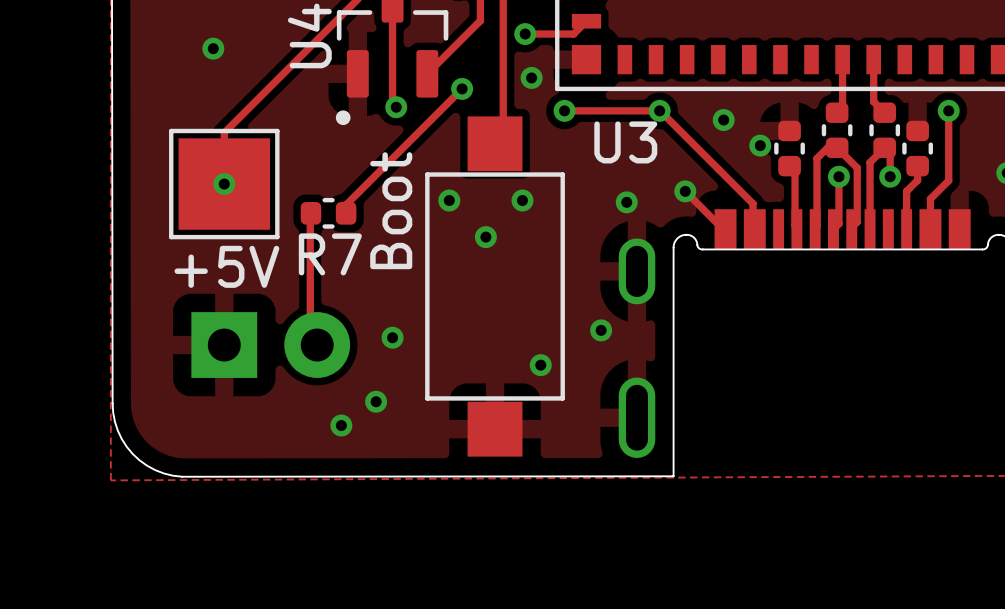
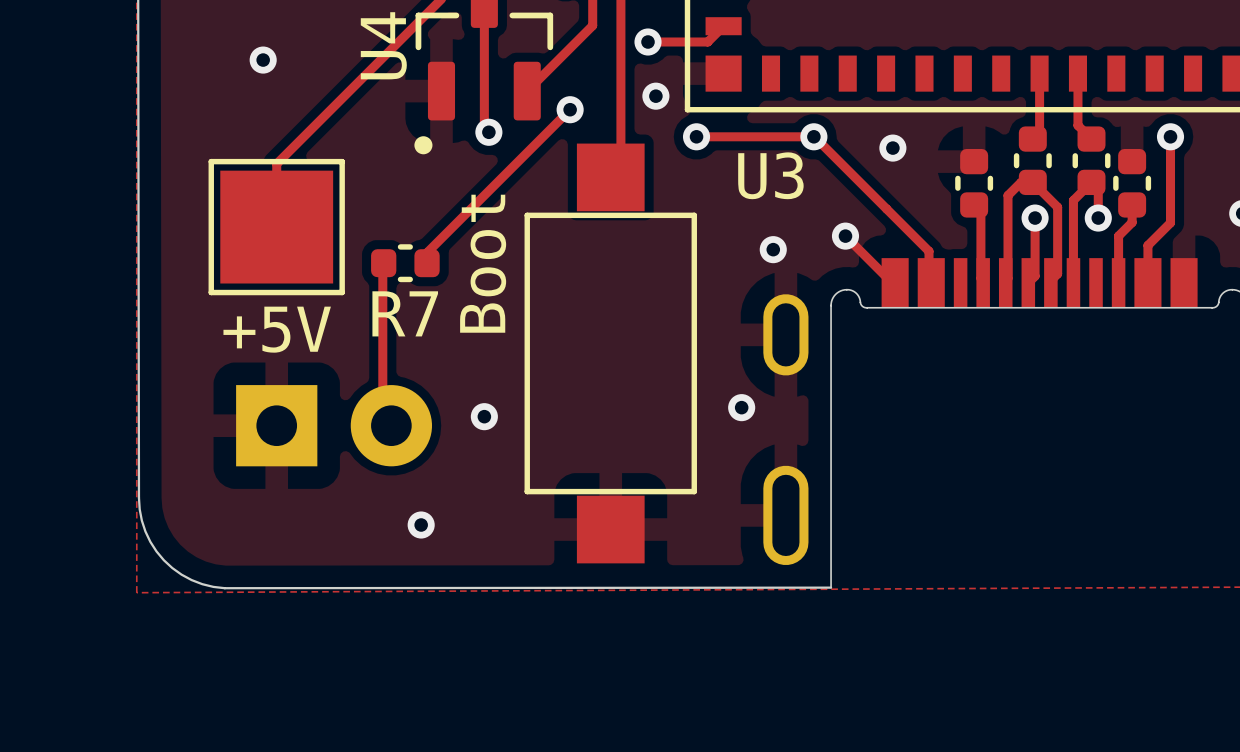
via: (760, 145) -> none
via: (224, 184) -> none
via: (449, 200) -> none
via: (522, 200) -> none
via: (485, 237) -> none
via: (540, 365) -> none
via: (376, 401) -> none

